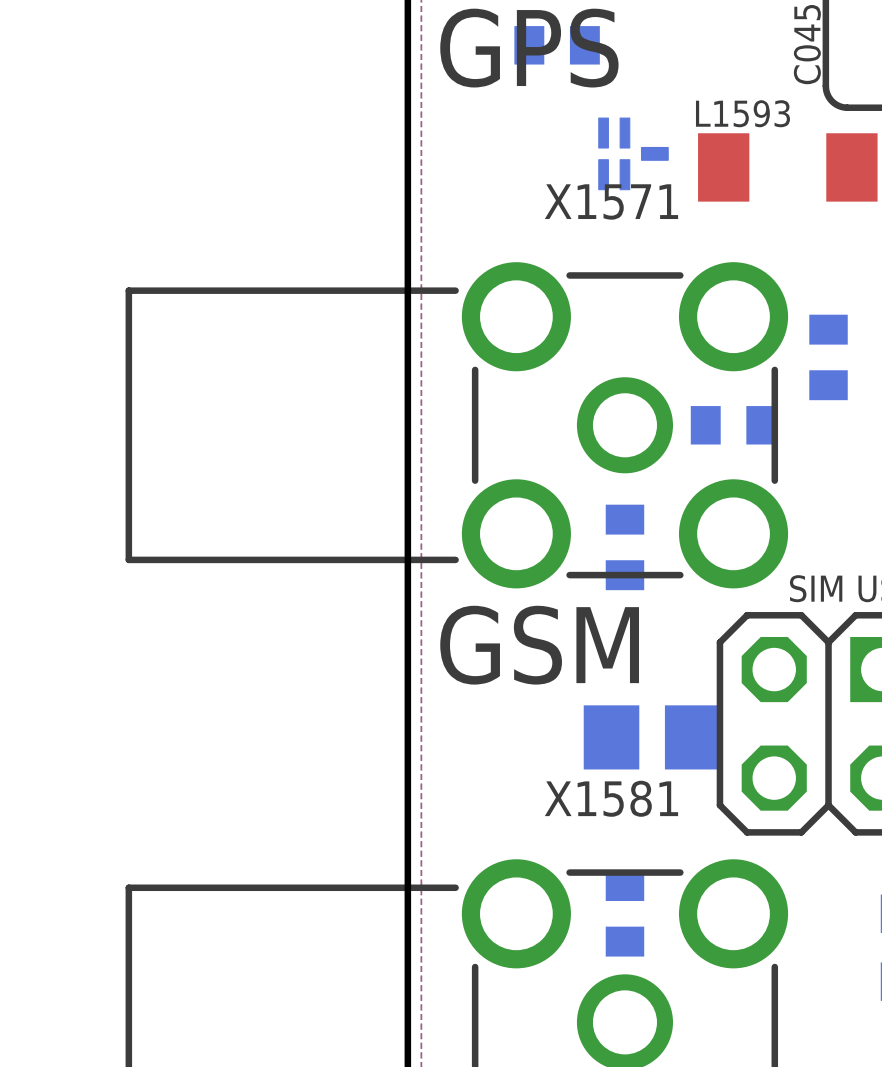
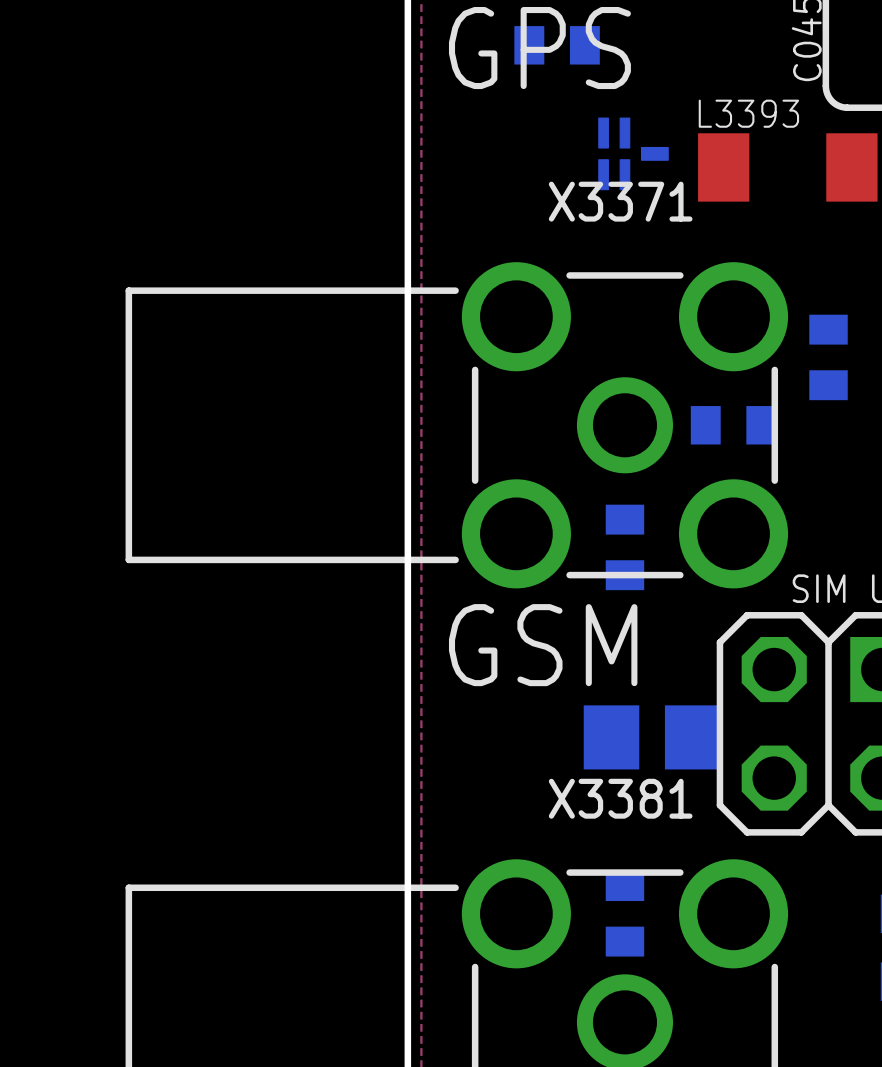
L1593 name: L1593 (742, 113) -> L3393 (748, 113)
X1571 name: X1571 (611, 201) -> X3371 (620, 201)
X1581 name: X1581 (611, 798) -> X3381 (620, 798)

